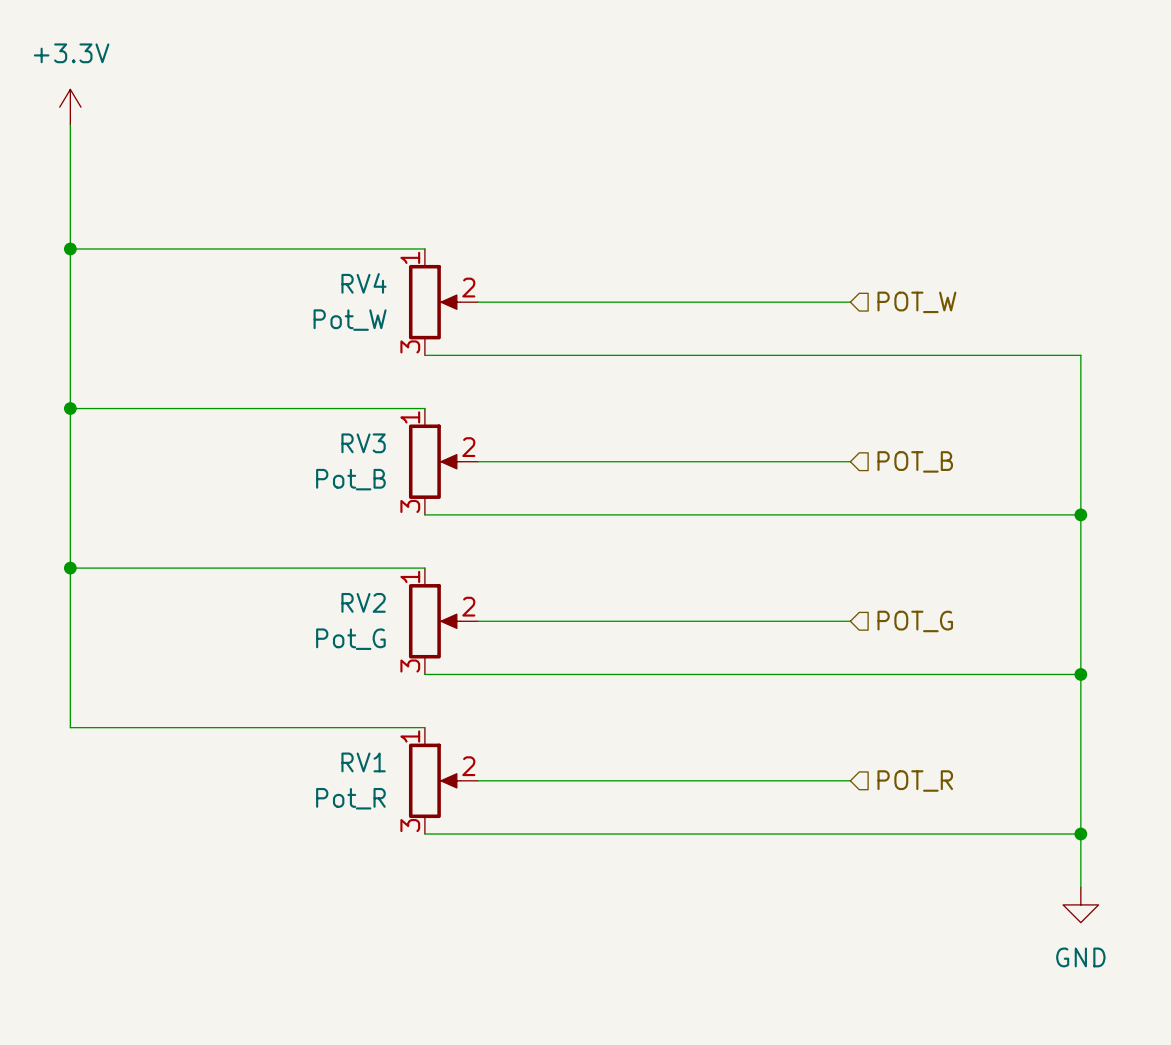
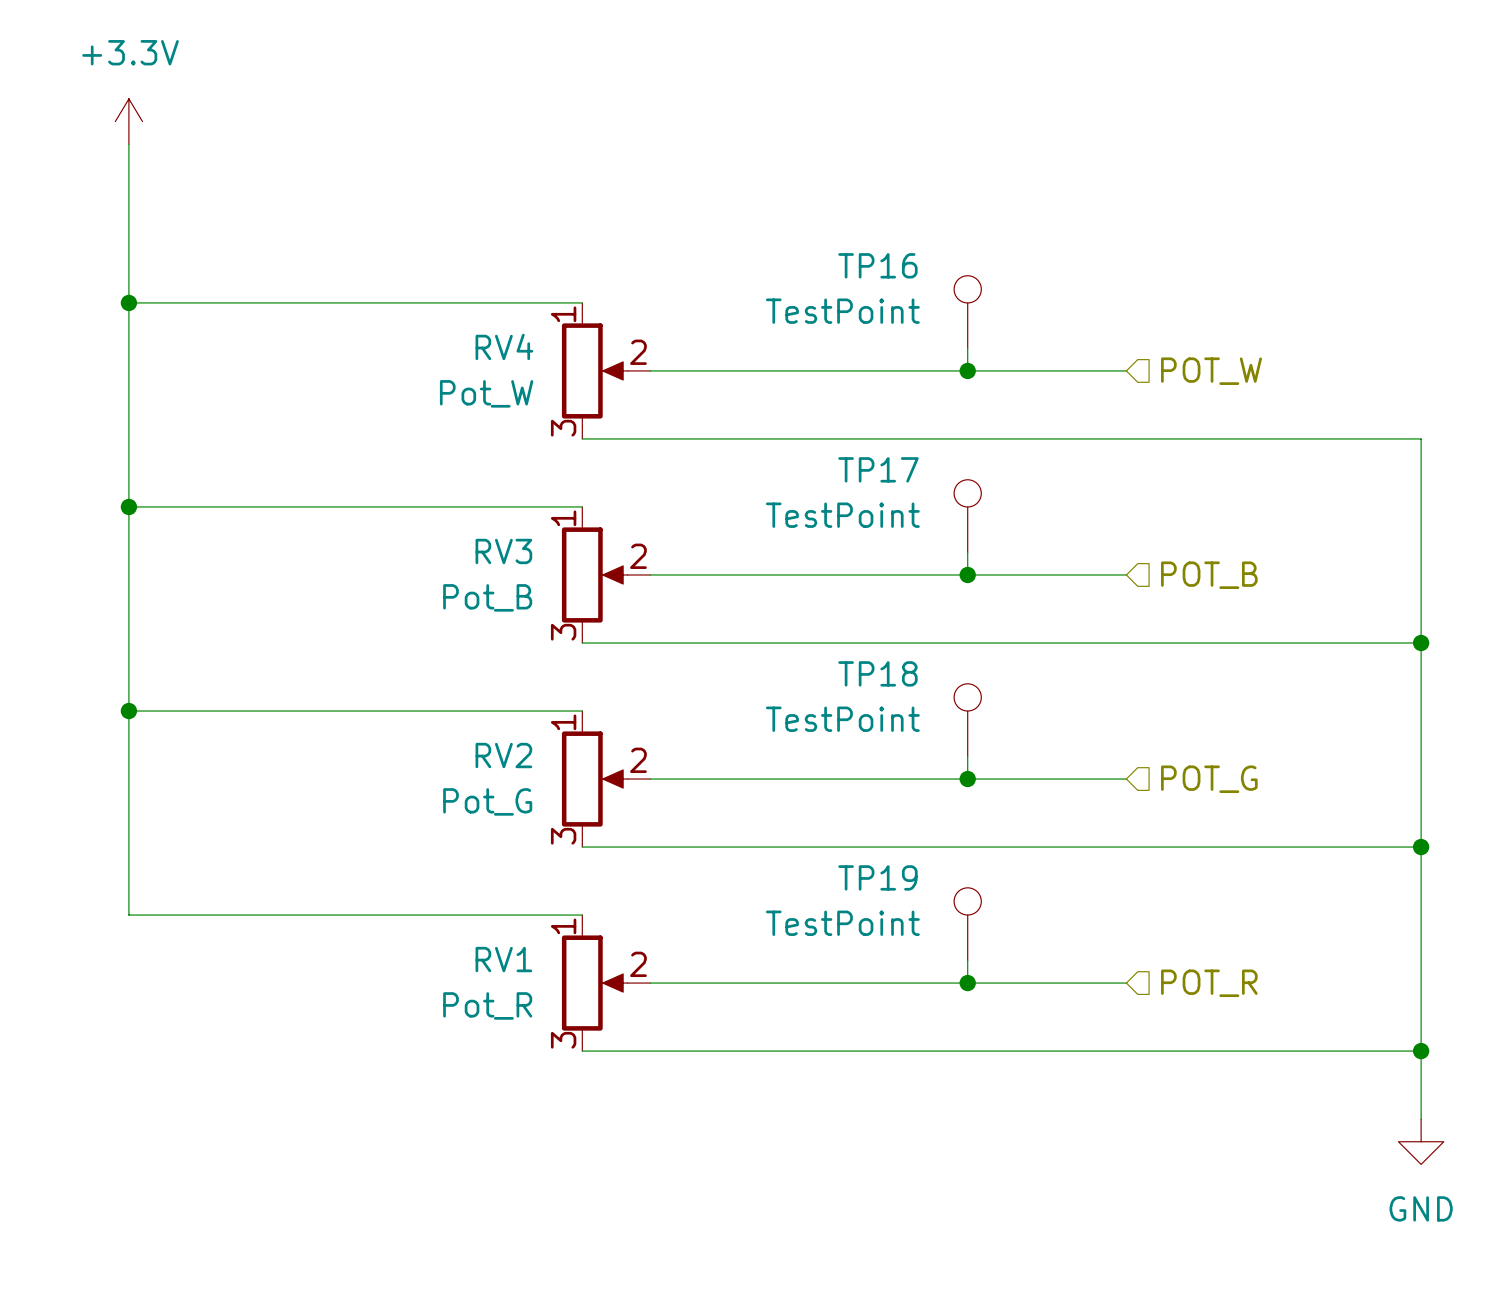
TP16: none -> TestPoint (967, 312)
wire: none -> (967, 348) (967, 370)
junction: none -> (967, 370)
TP17: none -> TestPoint (967, 516)
wire: none -> (967, 552) (967, 574)
junction: none -> (967, 574)
TP18: none -> TestPoint (967, 720)
wire: none -> (967, 756) (967, 779)
junction: none -> (967, 779)
TP19: none -> TestPoint (967, 924)
wire: none -> (967, 960) (967, 983)
junction: none -> (967, 983)

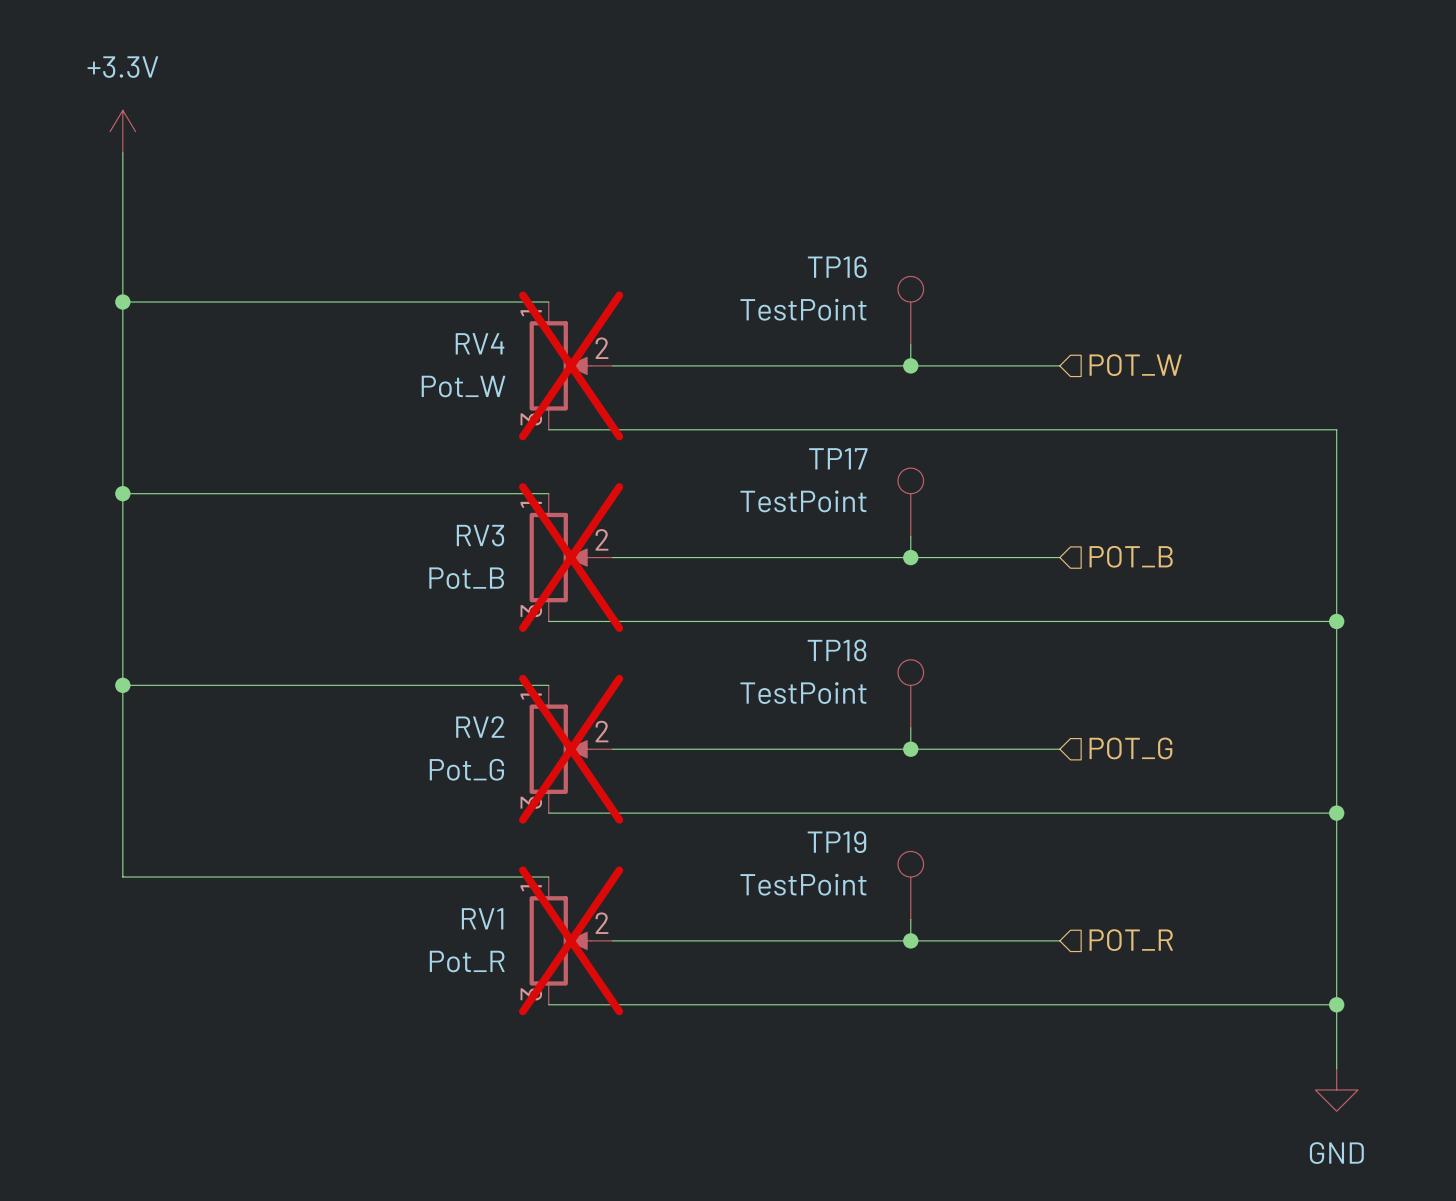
RV4 do-not-place cross: none -> (571, 365)
RV3 do-not-place cross: none -> (571, 557)
RV2 do-not-place cross: none -> (571, 749)
RV1 do-not-place cross: none -> (571, 940)

